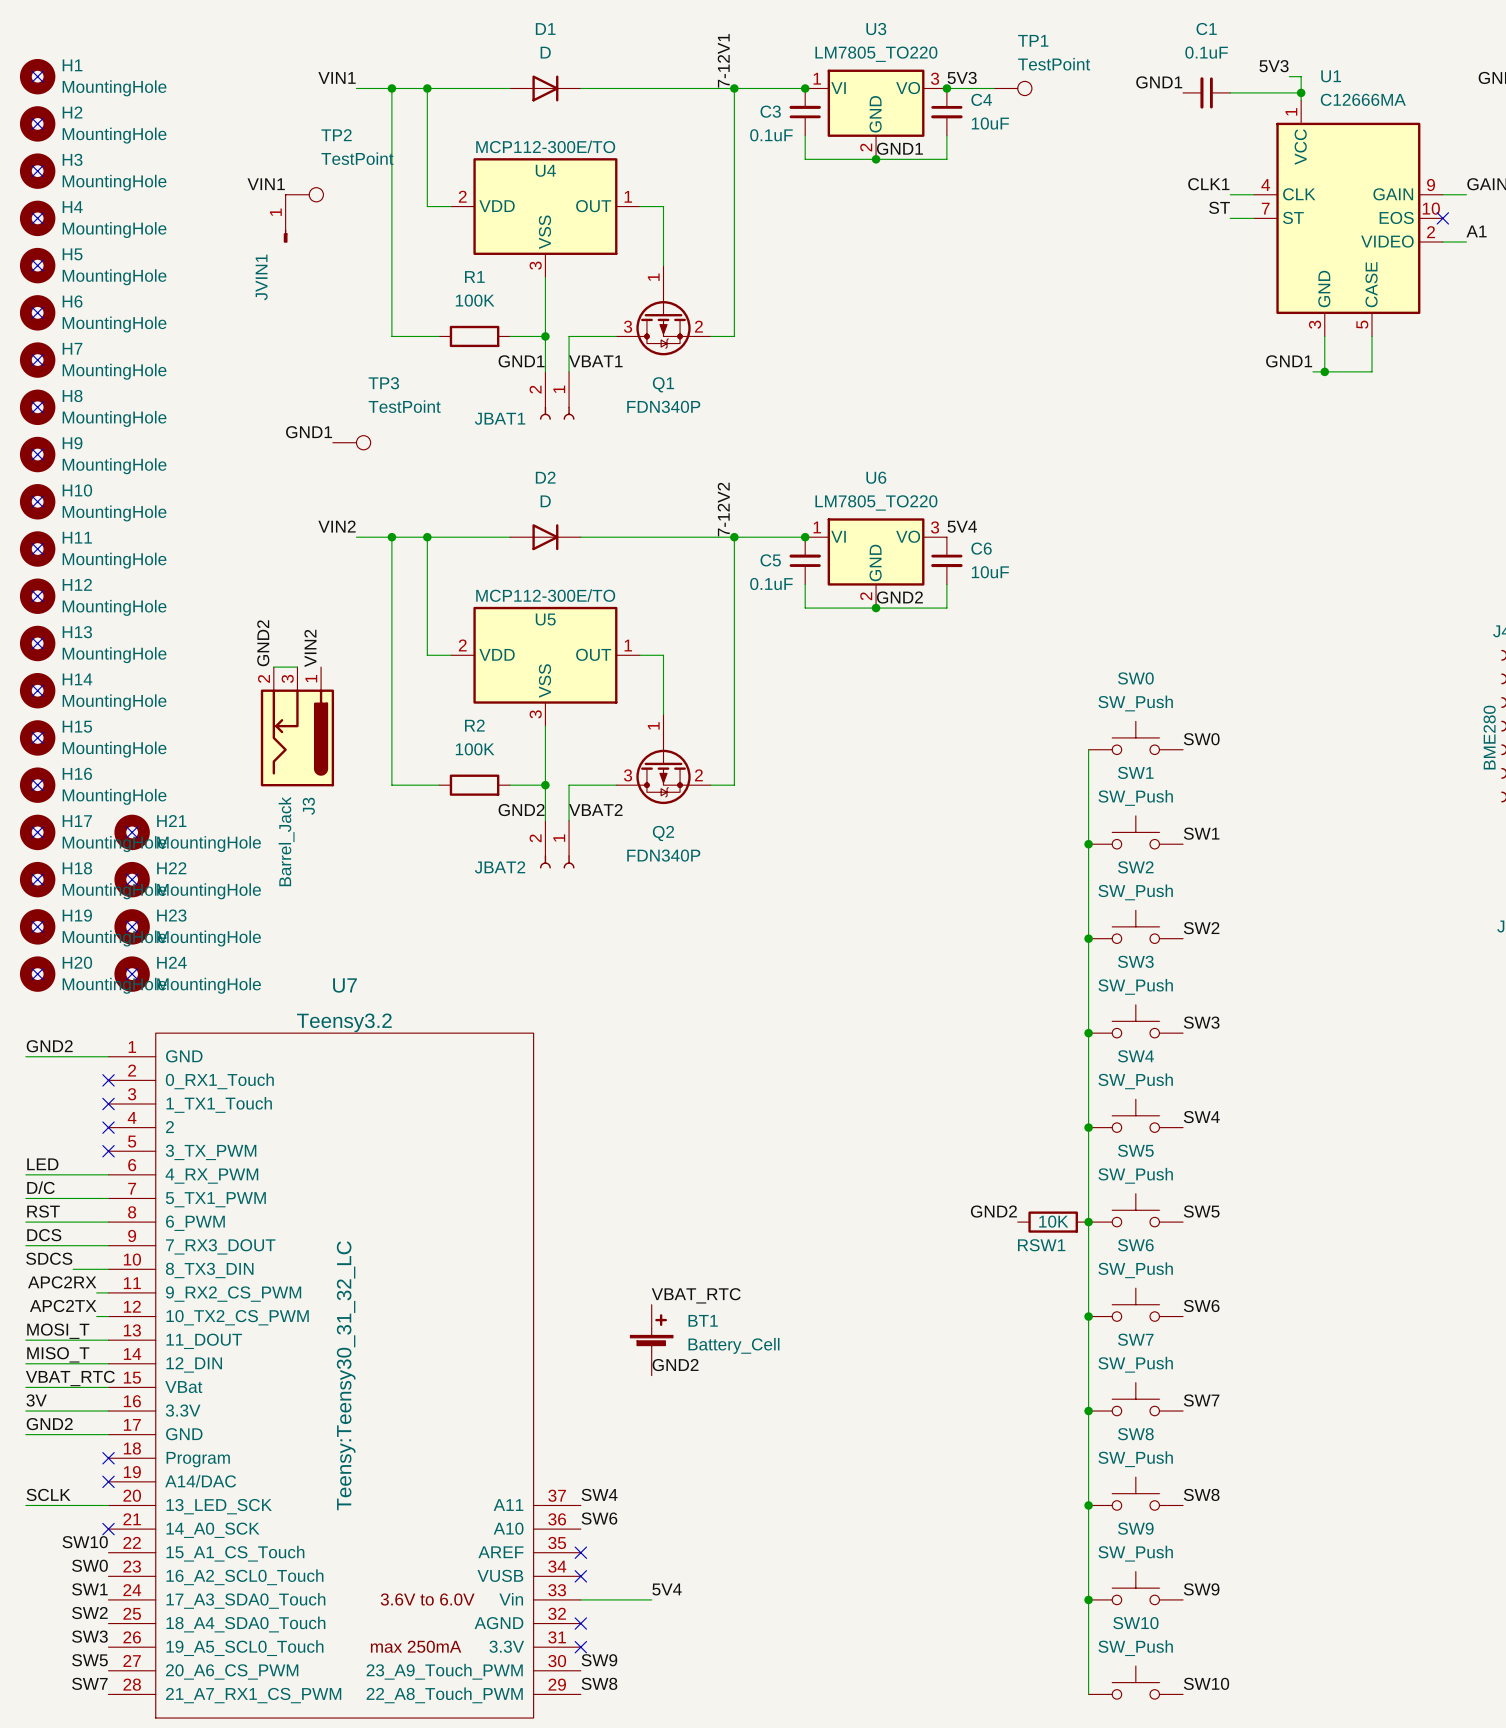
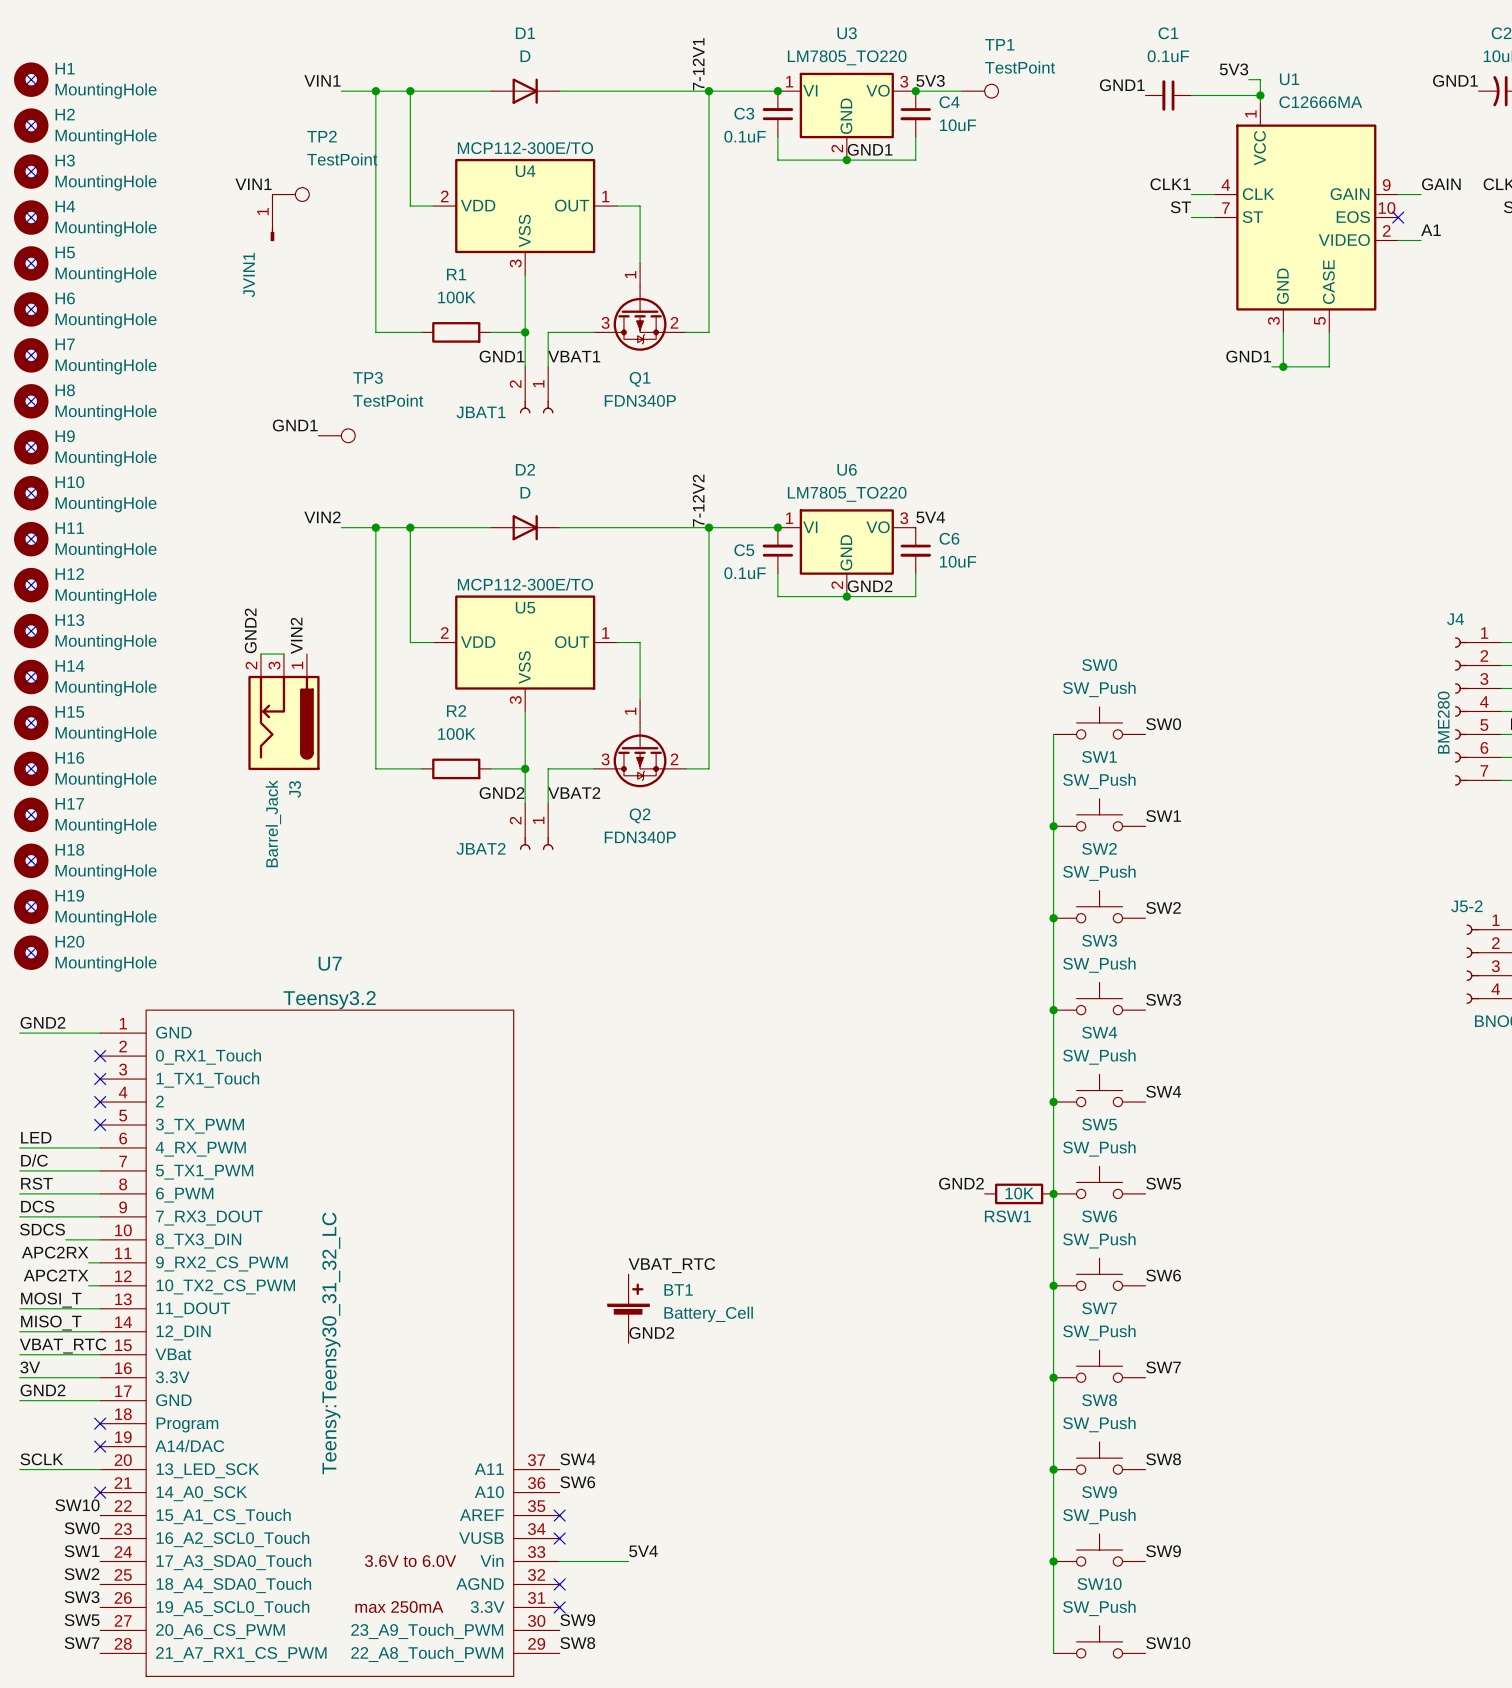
no-connect mark: (132, 832) -> none
H21: MountingHole (132, 832) -> none
no-connect mark: (132, 879) -> none
H22: MountingHole (132, 879) -> none
no-connect mark: (132, 926) -> none
H23: MountingHole (132, 926) -> none
no-connect mark: (132, 974) -> none
H24: MountingHole (132, 974) -> none

